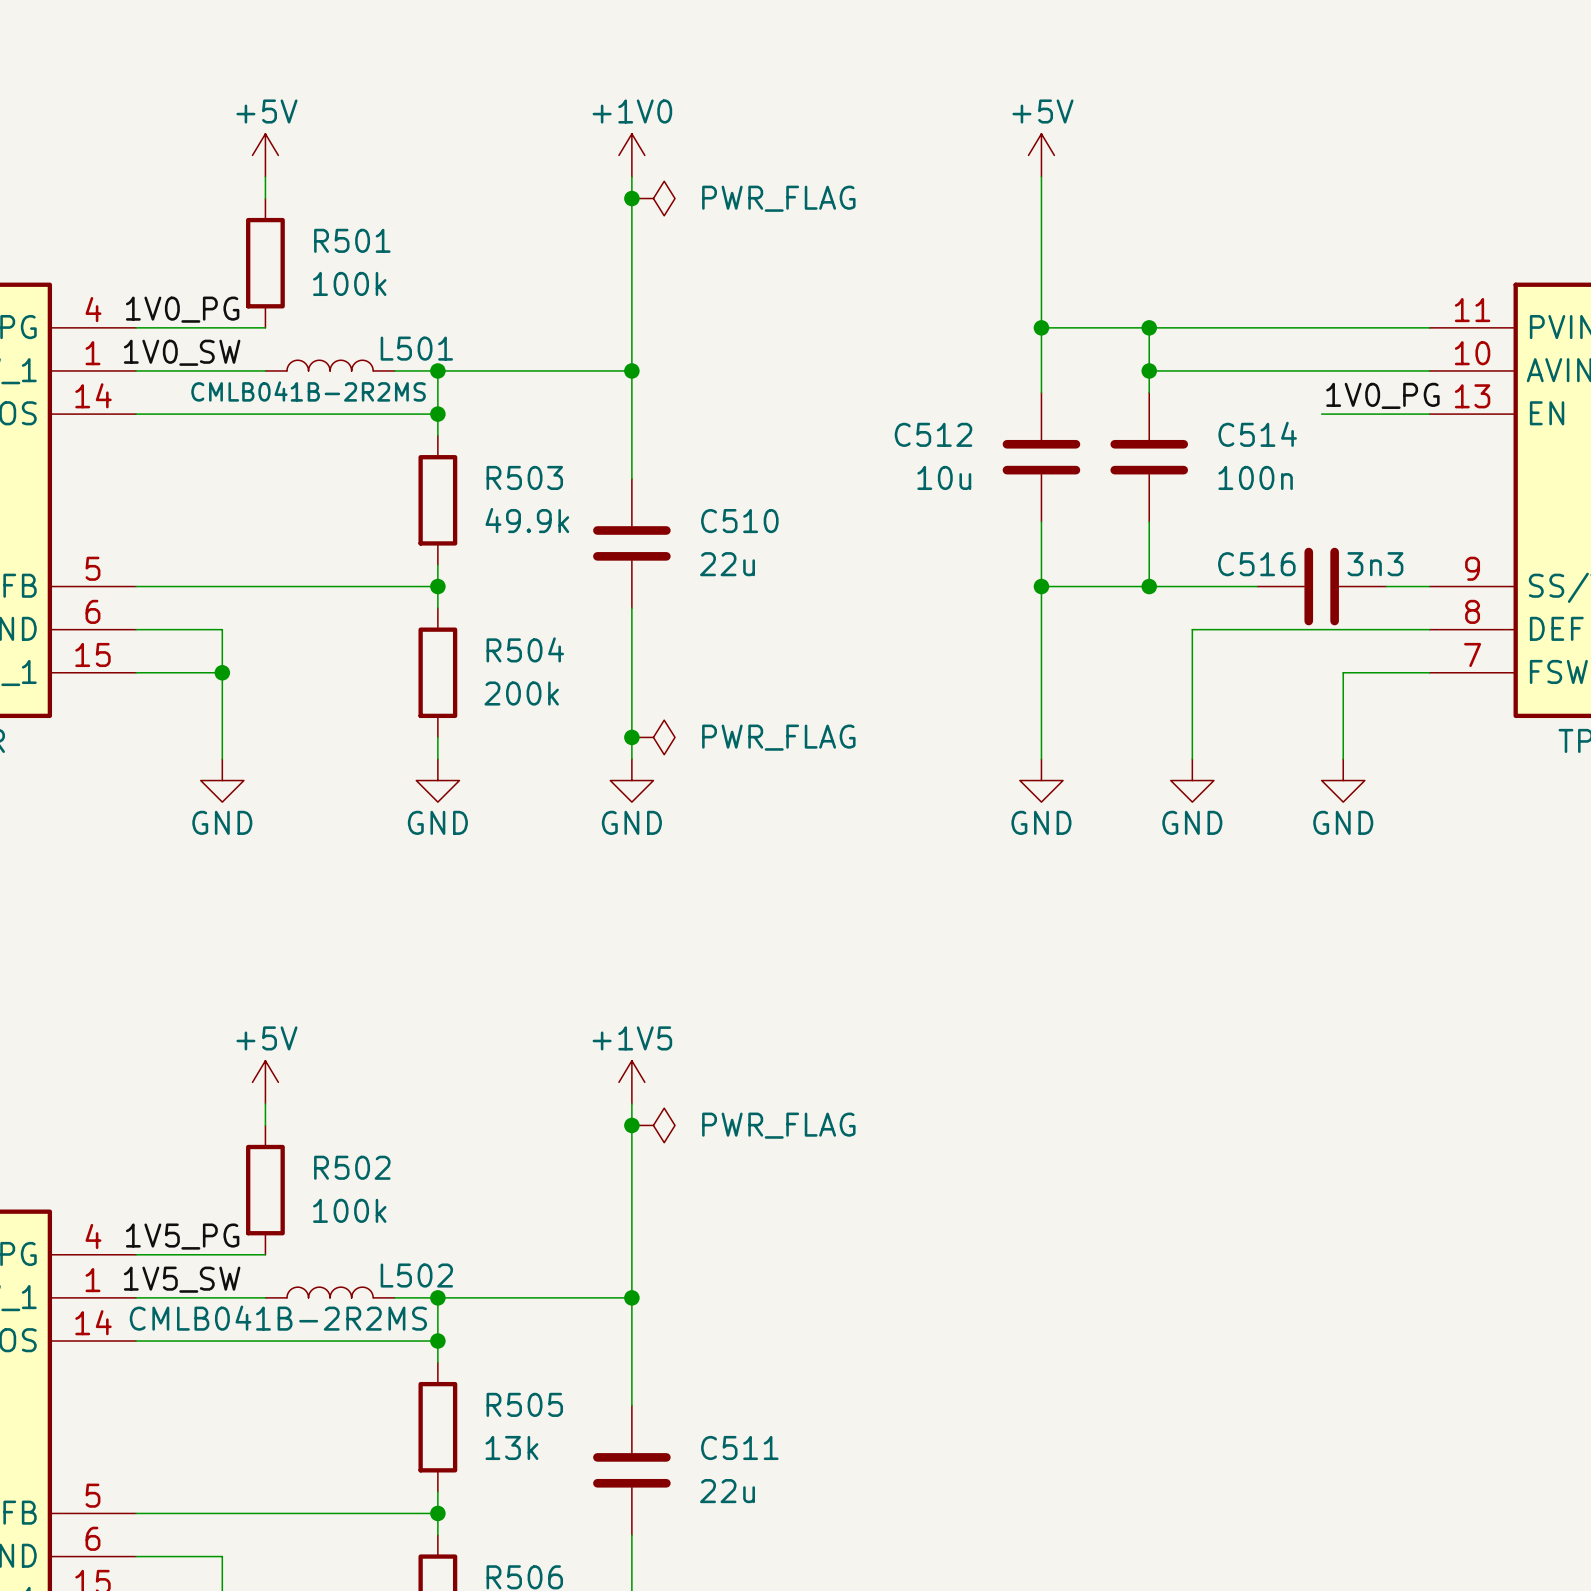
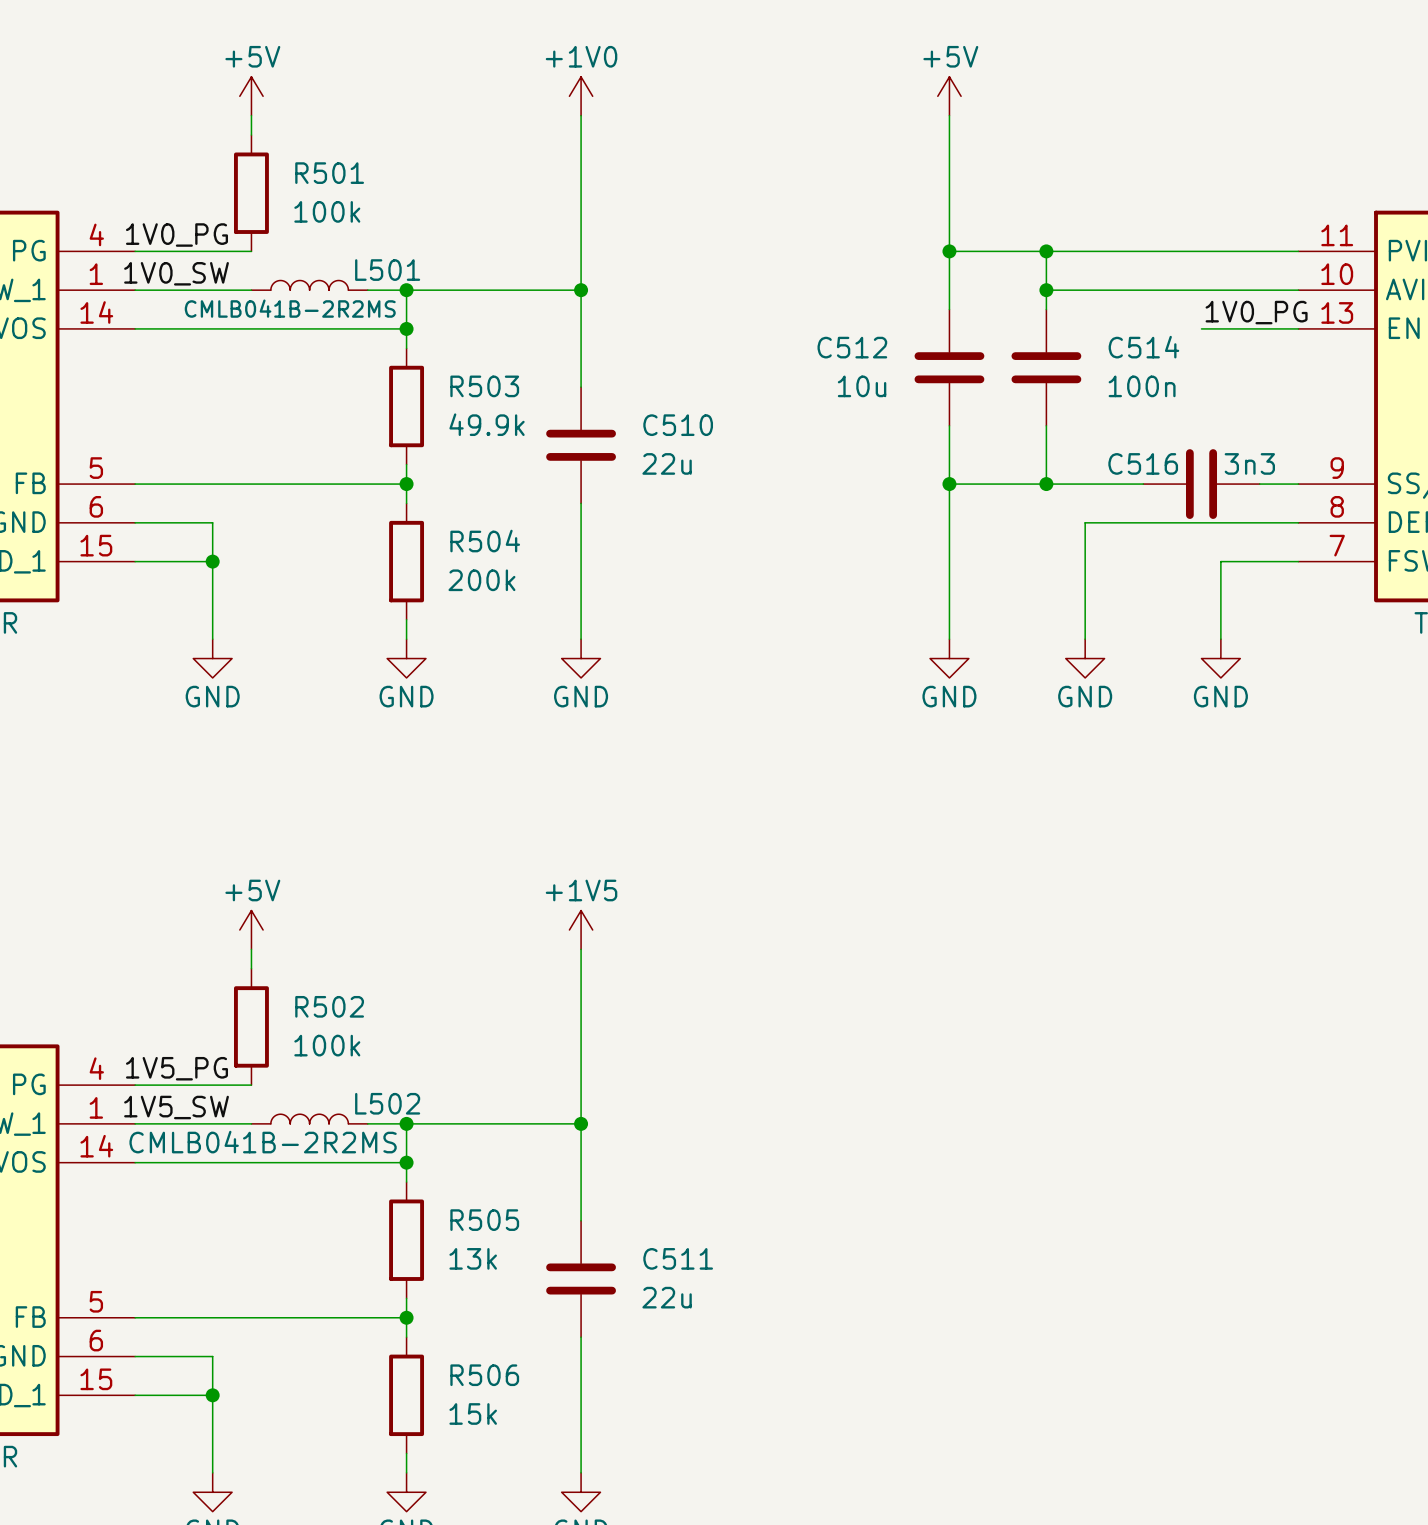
junction: (631, 198) -> none
power symbol: PWR_FLAG (653, 198) -> none
junction: (631, 737) -> none
power symbol: PWR_FLAG (653, 737) -> none
junction: (631, 1125) -> none
power symbol: PWR_FLAG (653, 1125) -> none

